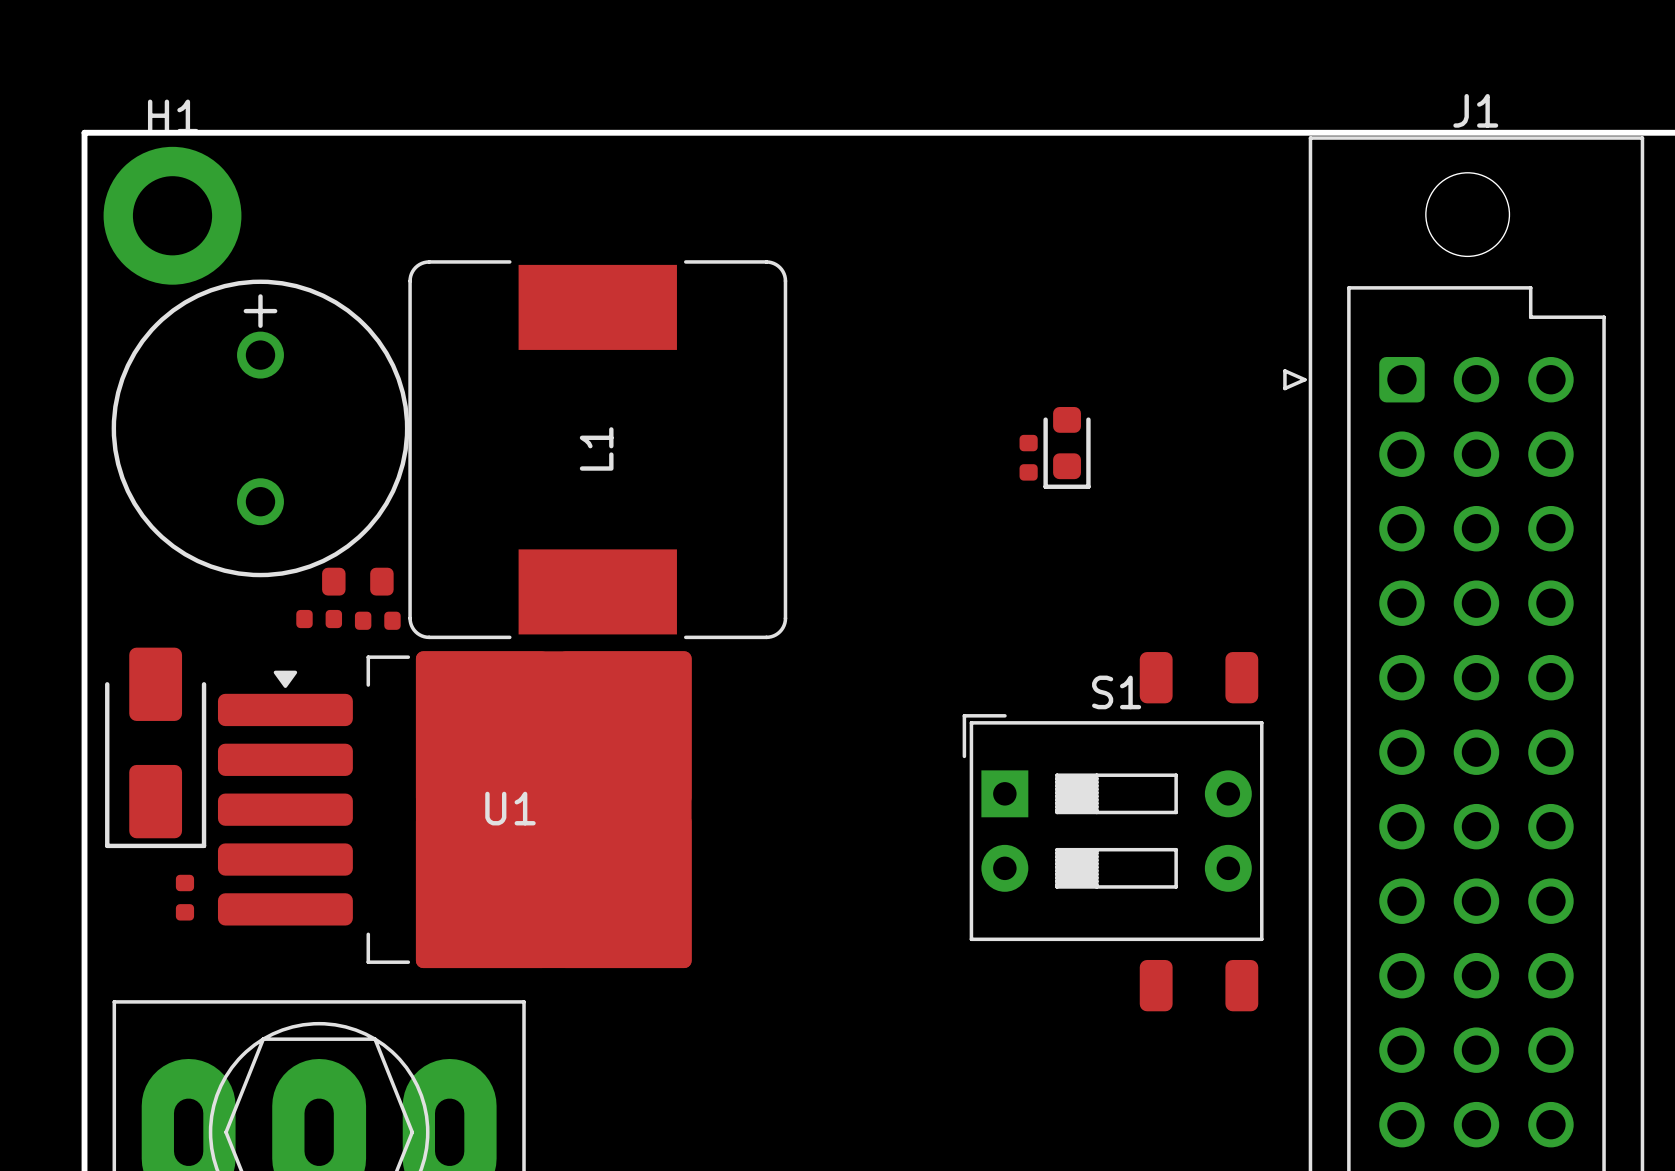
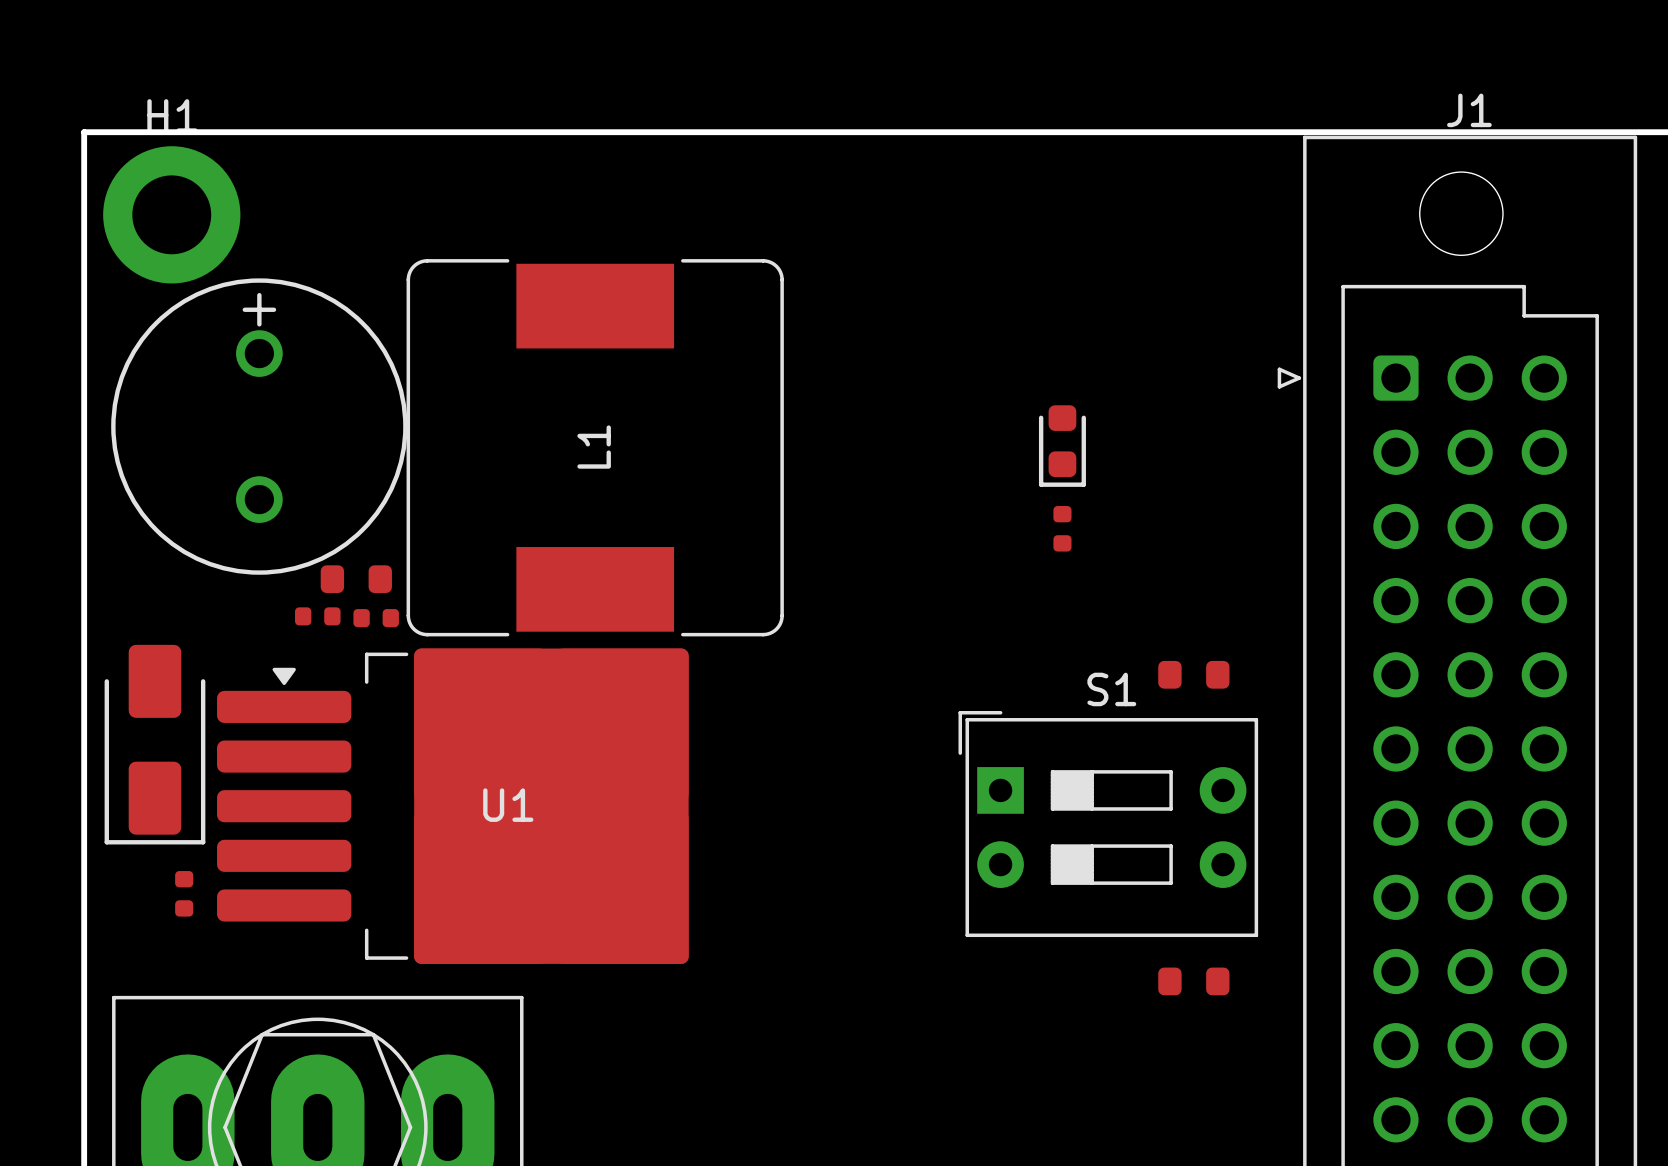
part position: (1028, 457) -> (1062, 528)
part footprint: [1139, 652, 1259, 704] -> [1158, 660, 1230, 689]
part footprint: [1139, 959, 1259, 1012] -> [1158, 967, 1230, 996]

